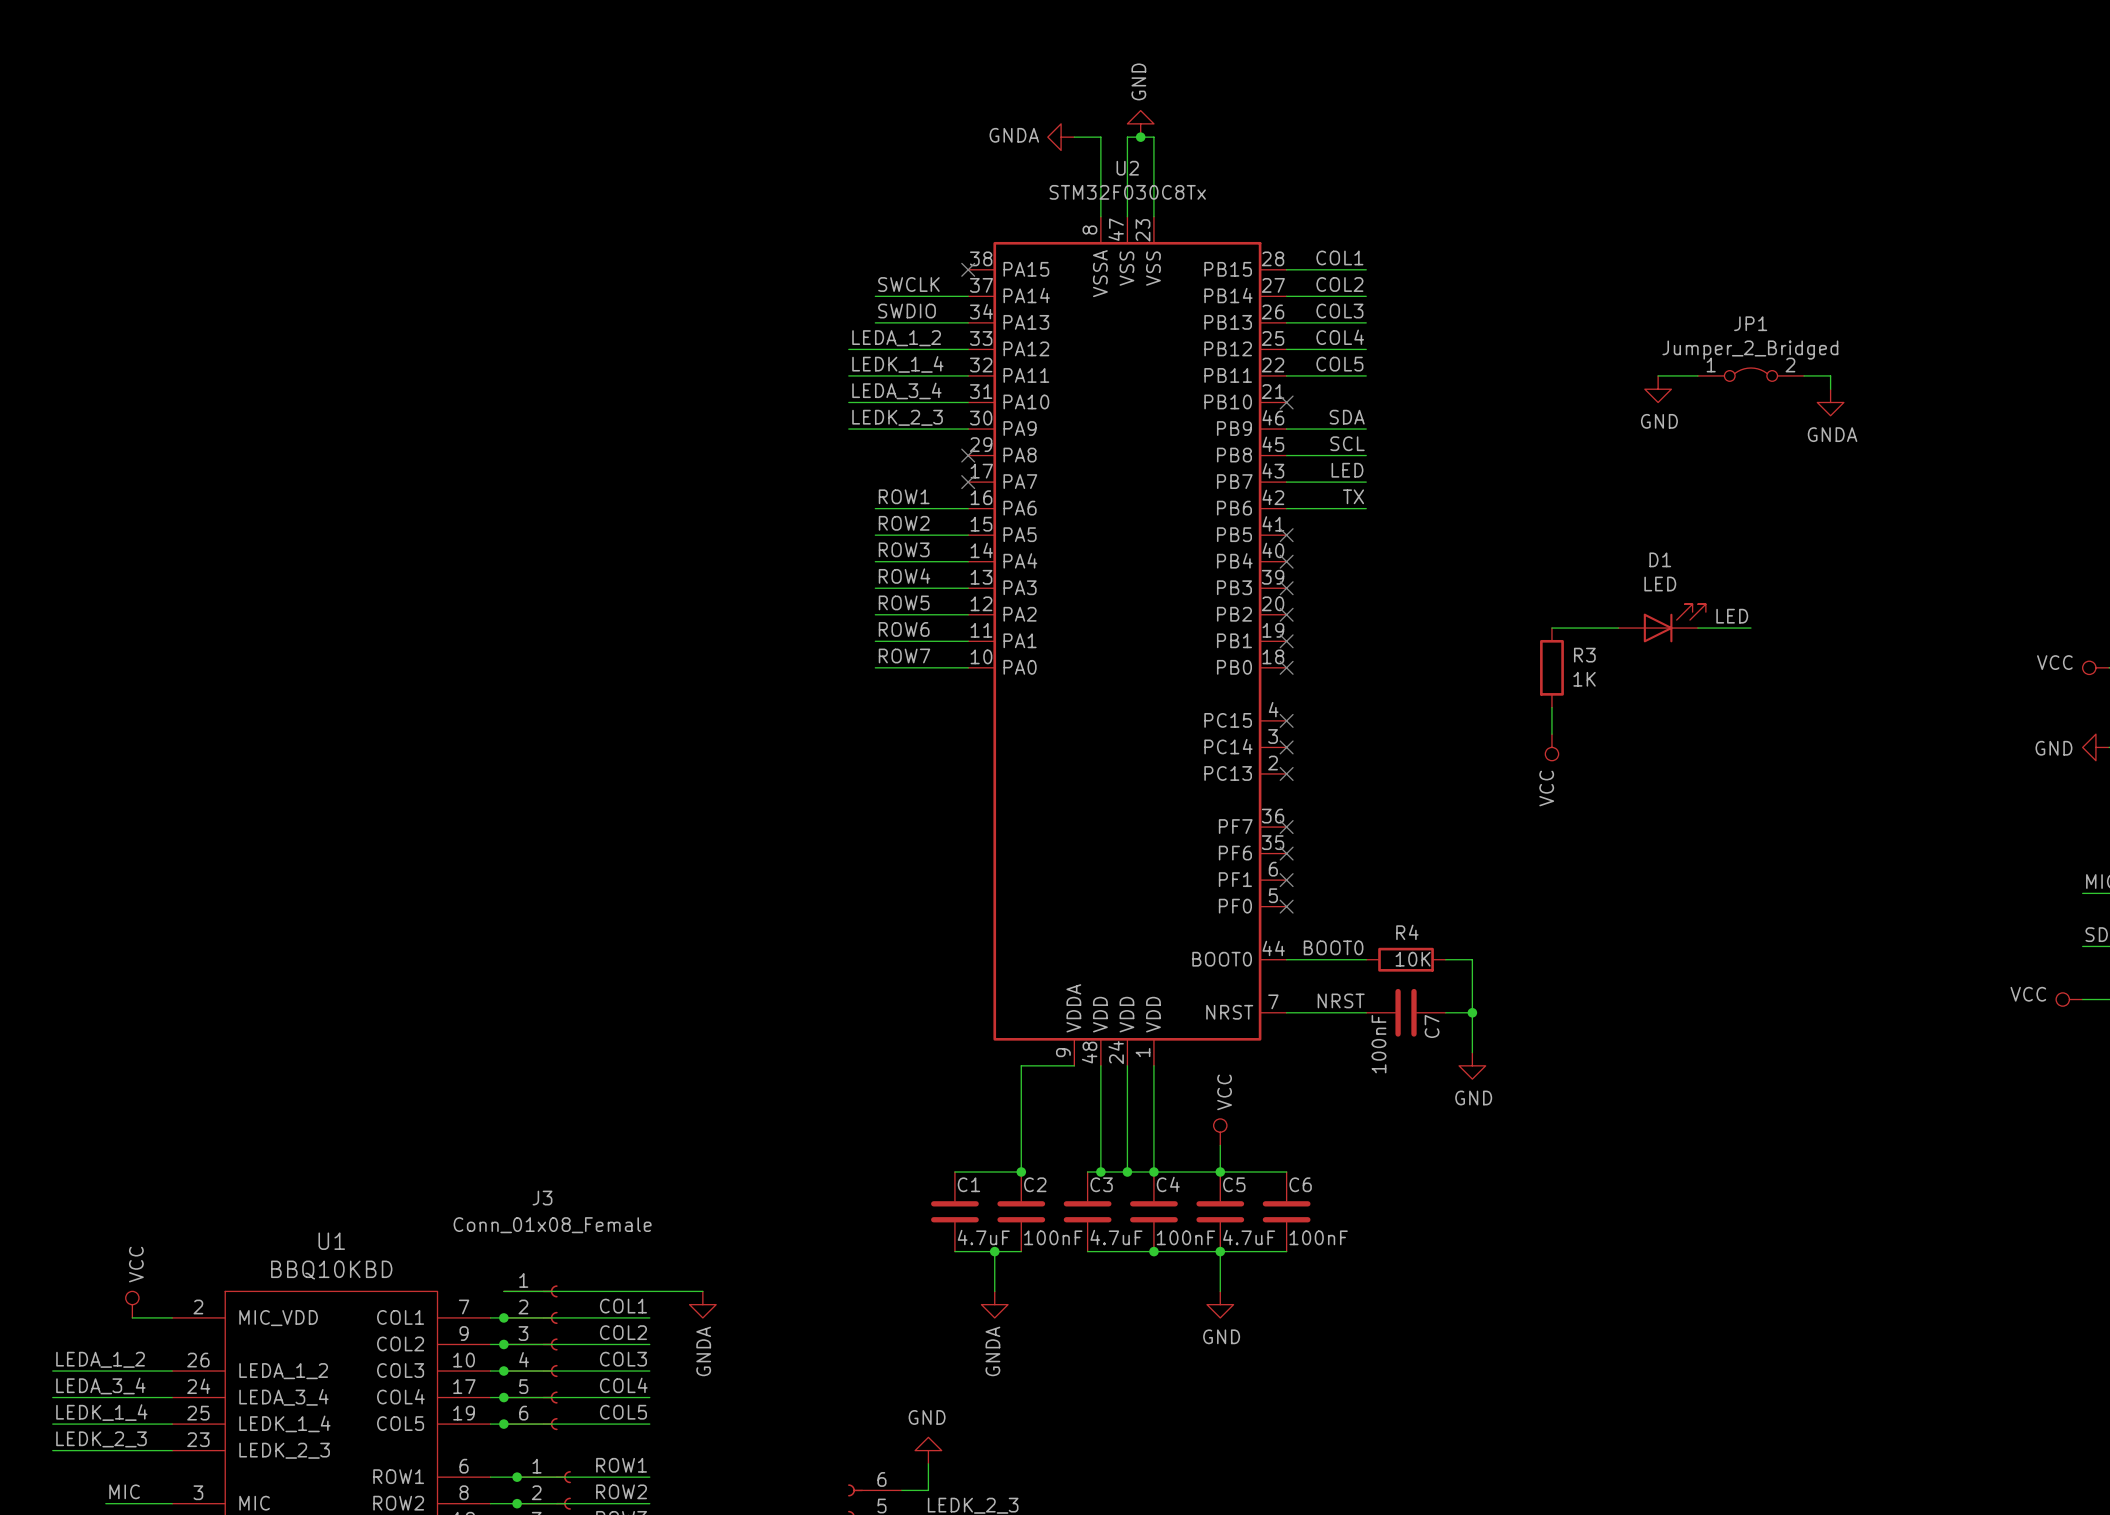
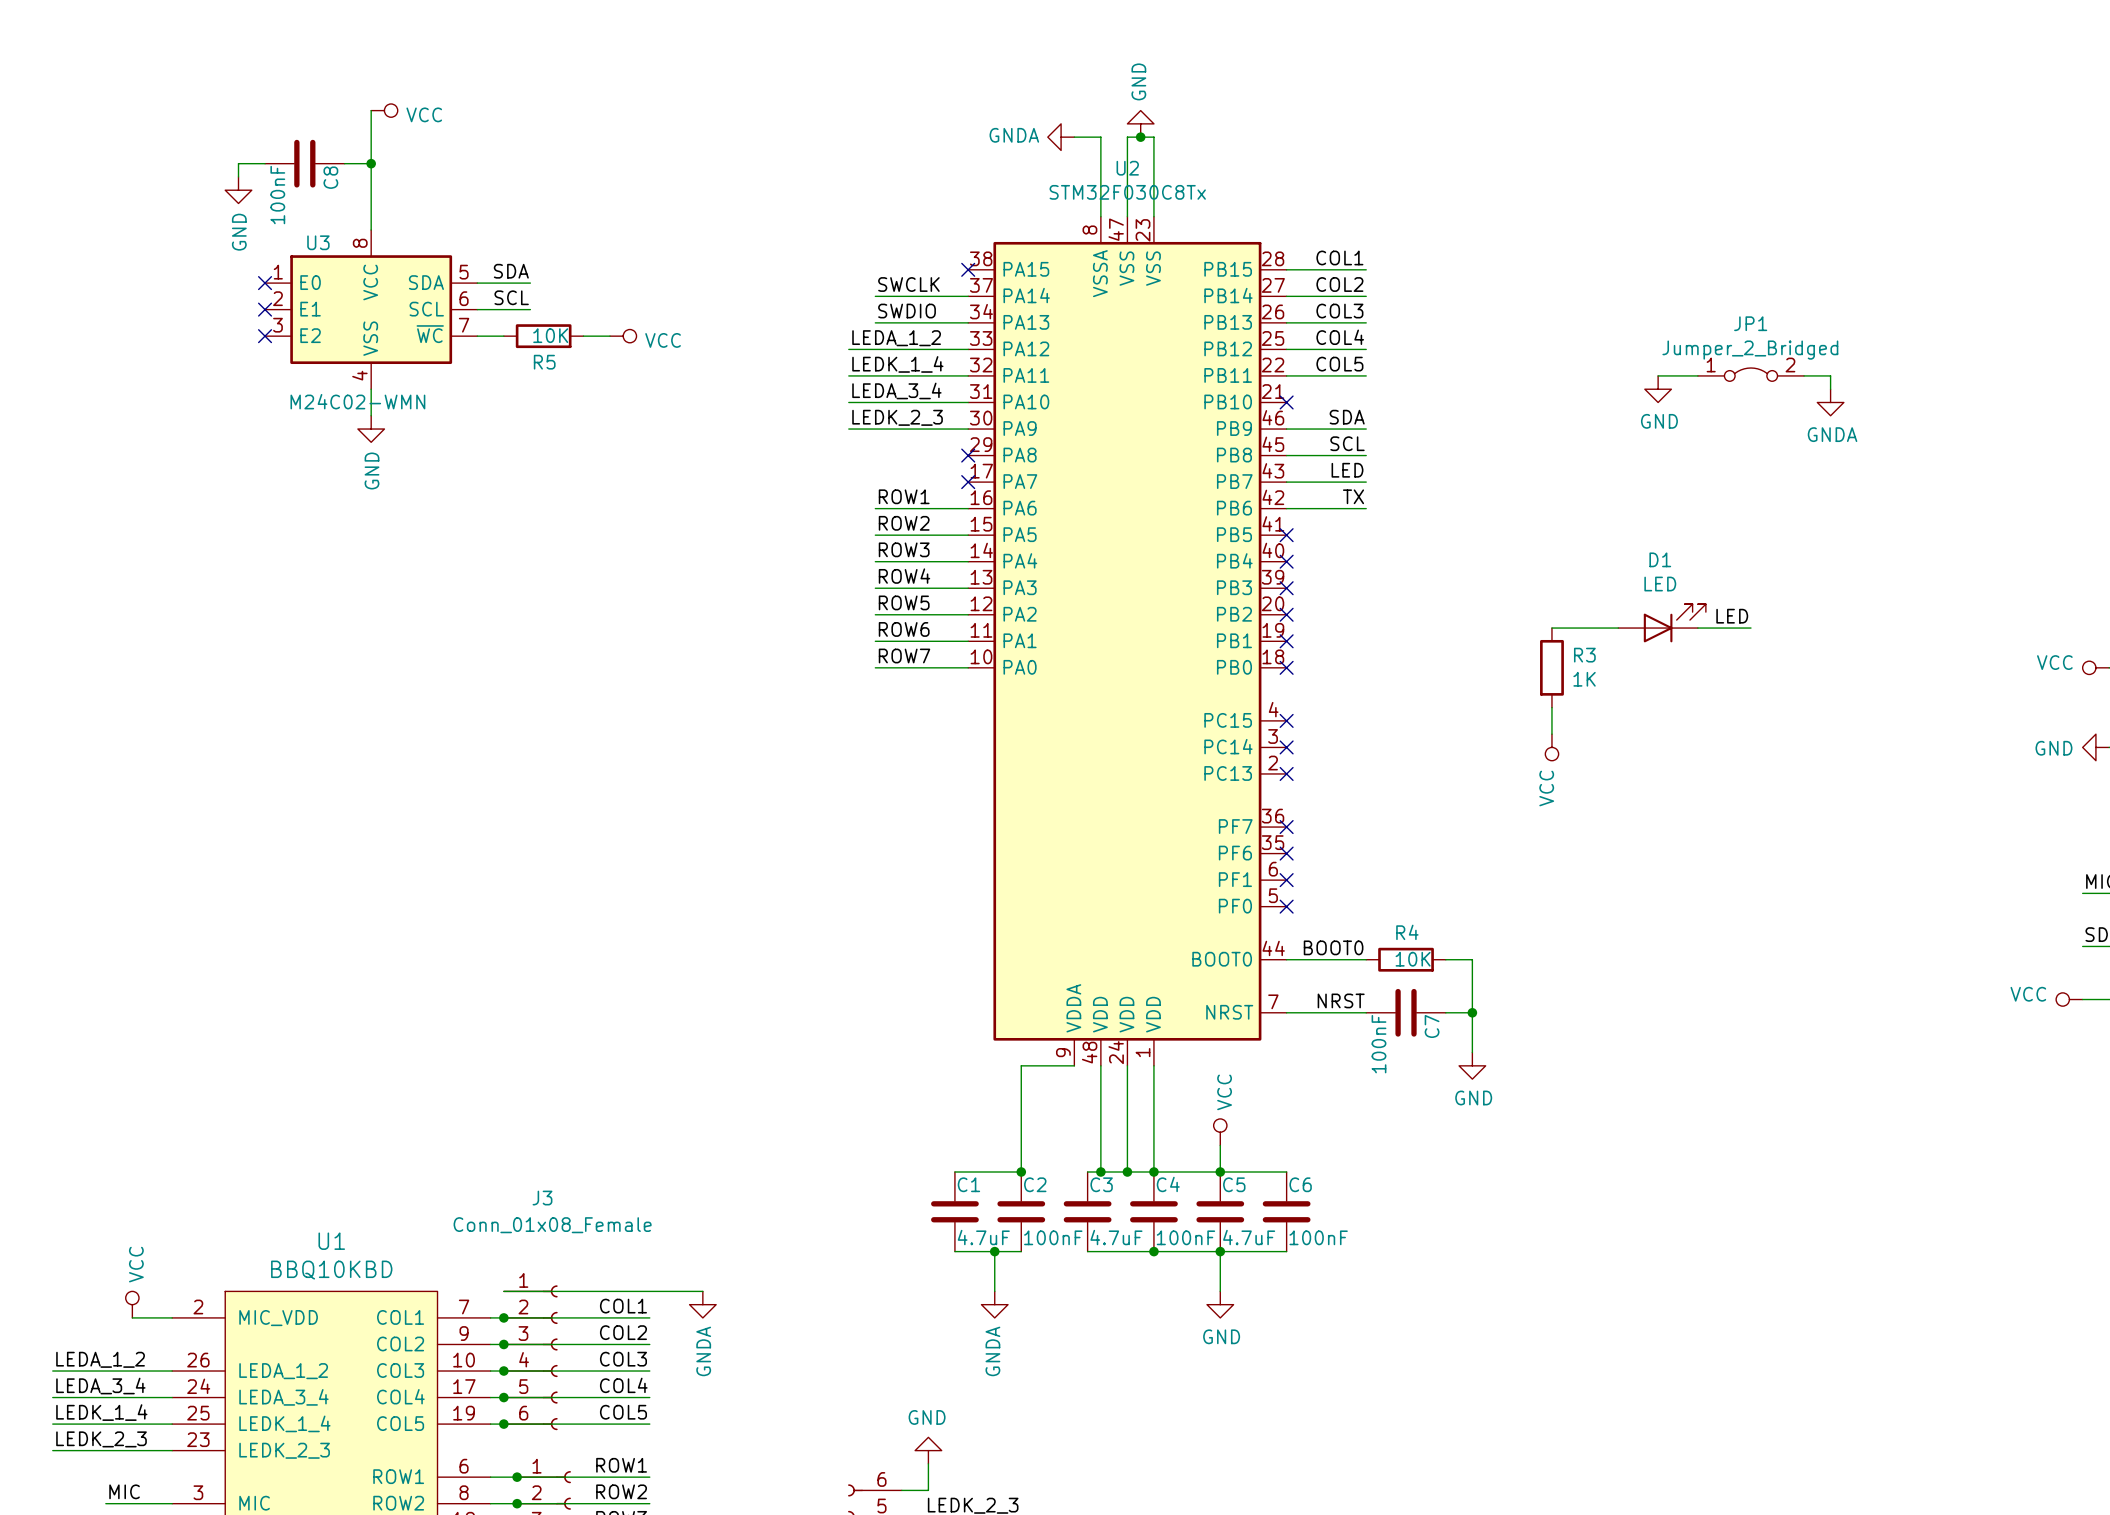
wire: none -> (371, 110) (371, 230)
power symbol: none -> VCC (384, 110)
wire: none -> (265, 163) (238, 163) (238, 176)
C8: none -> 100nF (304, 163)
wire: none -> (344, 163) (371, 163)
junction: none -> (371, 163)
power symbol: none -> GND (238, 190)
label: none -> SDA (511, 271)
no-connect mark: none -> (265, 283)
wire: none -> (477, 283) (530, 283)
label: none -> SCL (511, 297)
no-connect mark: none -> (265, 309)
U3: none -> M24C02-WMN (371, 309)
wire: none -> (477, 309) (530, 309)
no-connect mark: none -> (265, 336)
wire: none -> (477, 336) (503, 336)
R5: none -> 10K (543, 336)
wire: none -> (583, 336) (609, 336)
power symbol: none -> VCC (623, 336)
wire: none -> (371, 389) (371, 415)
power symbol: none -> GND (371, 429)

